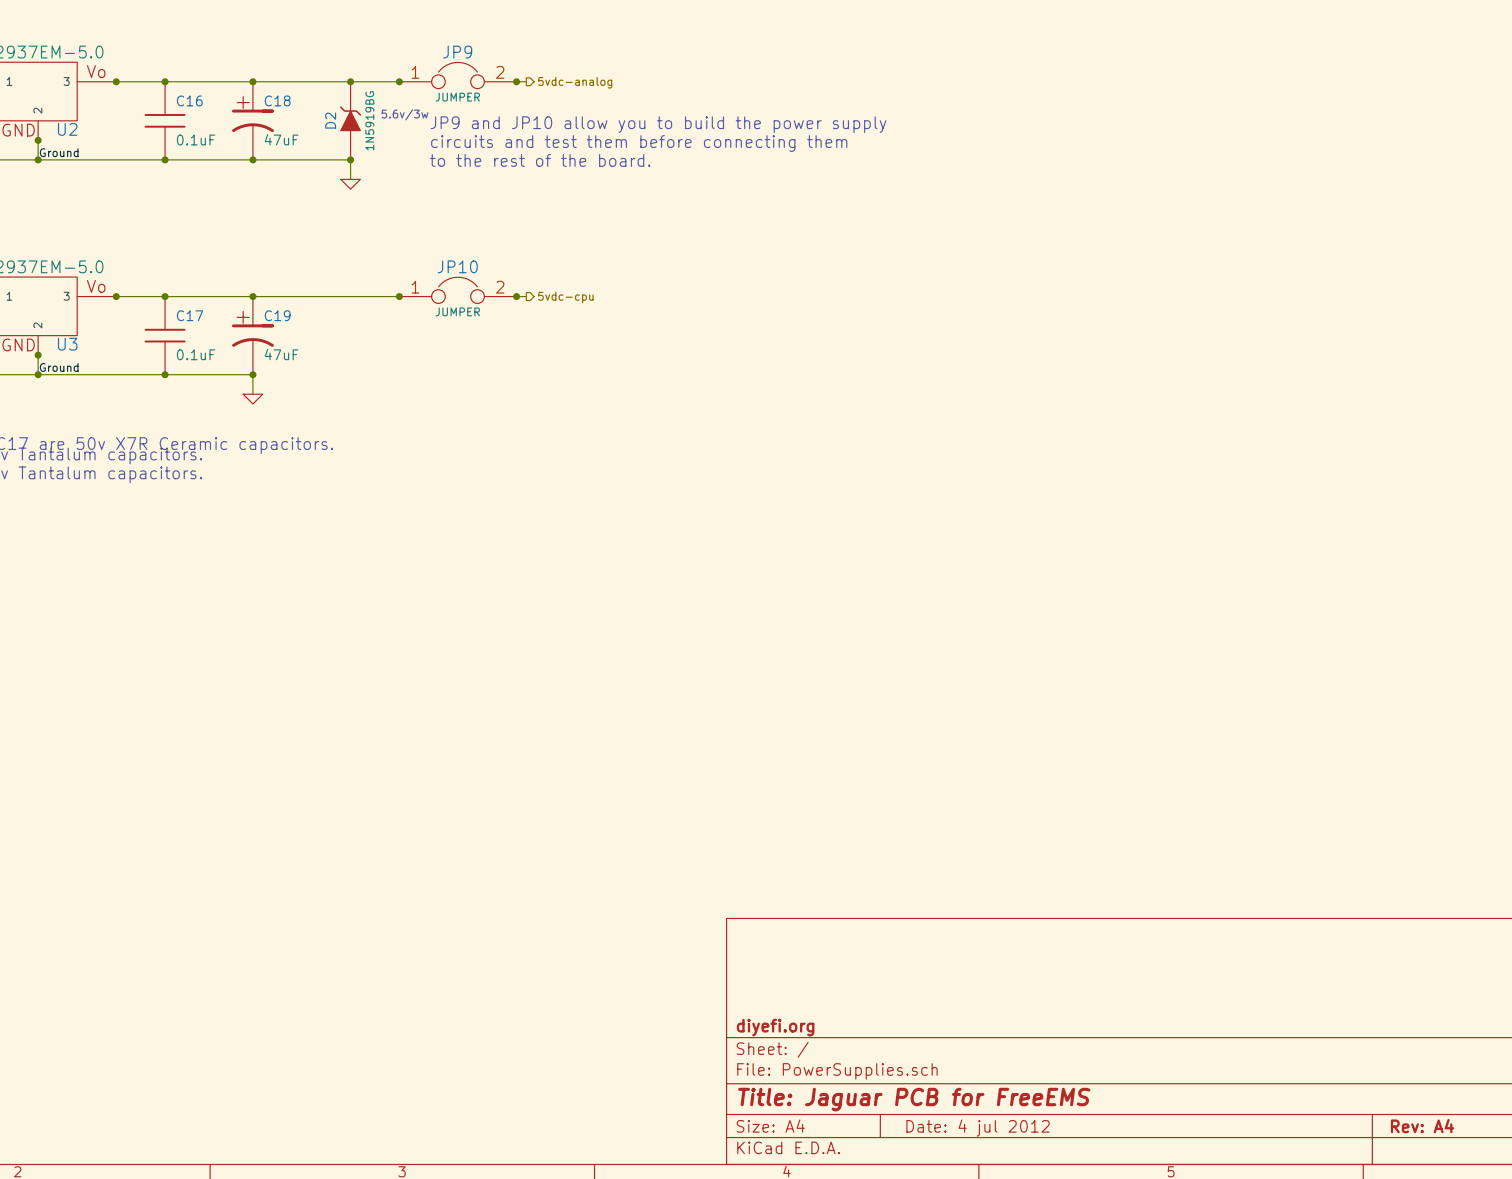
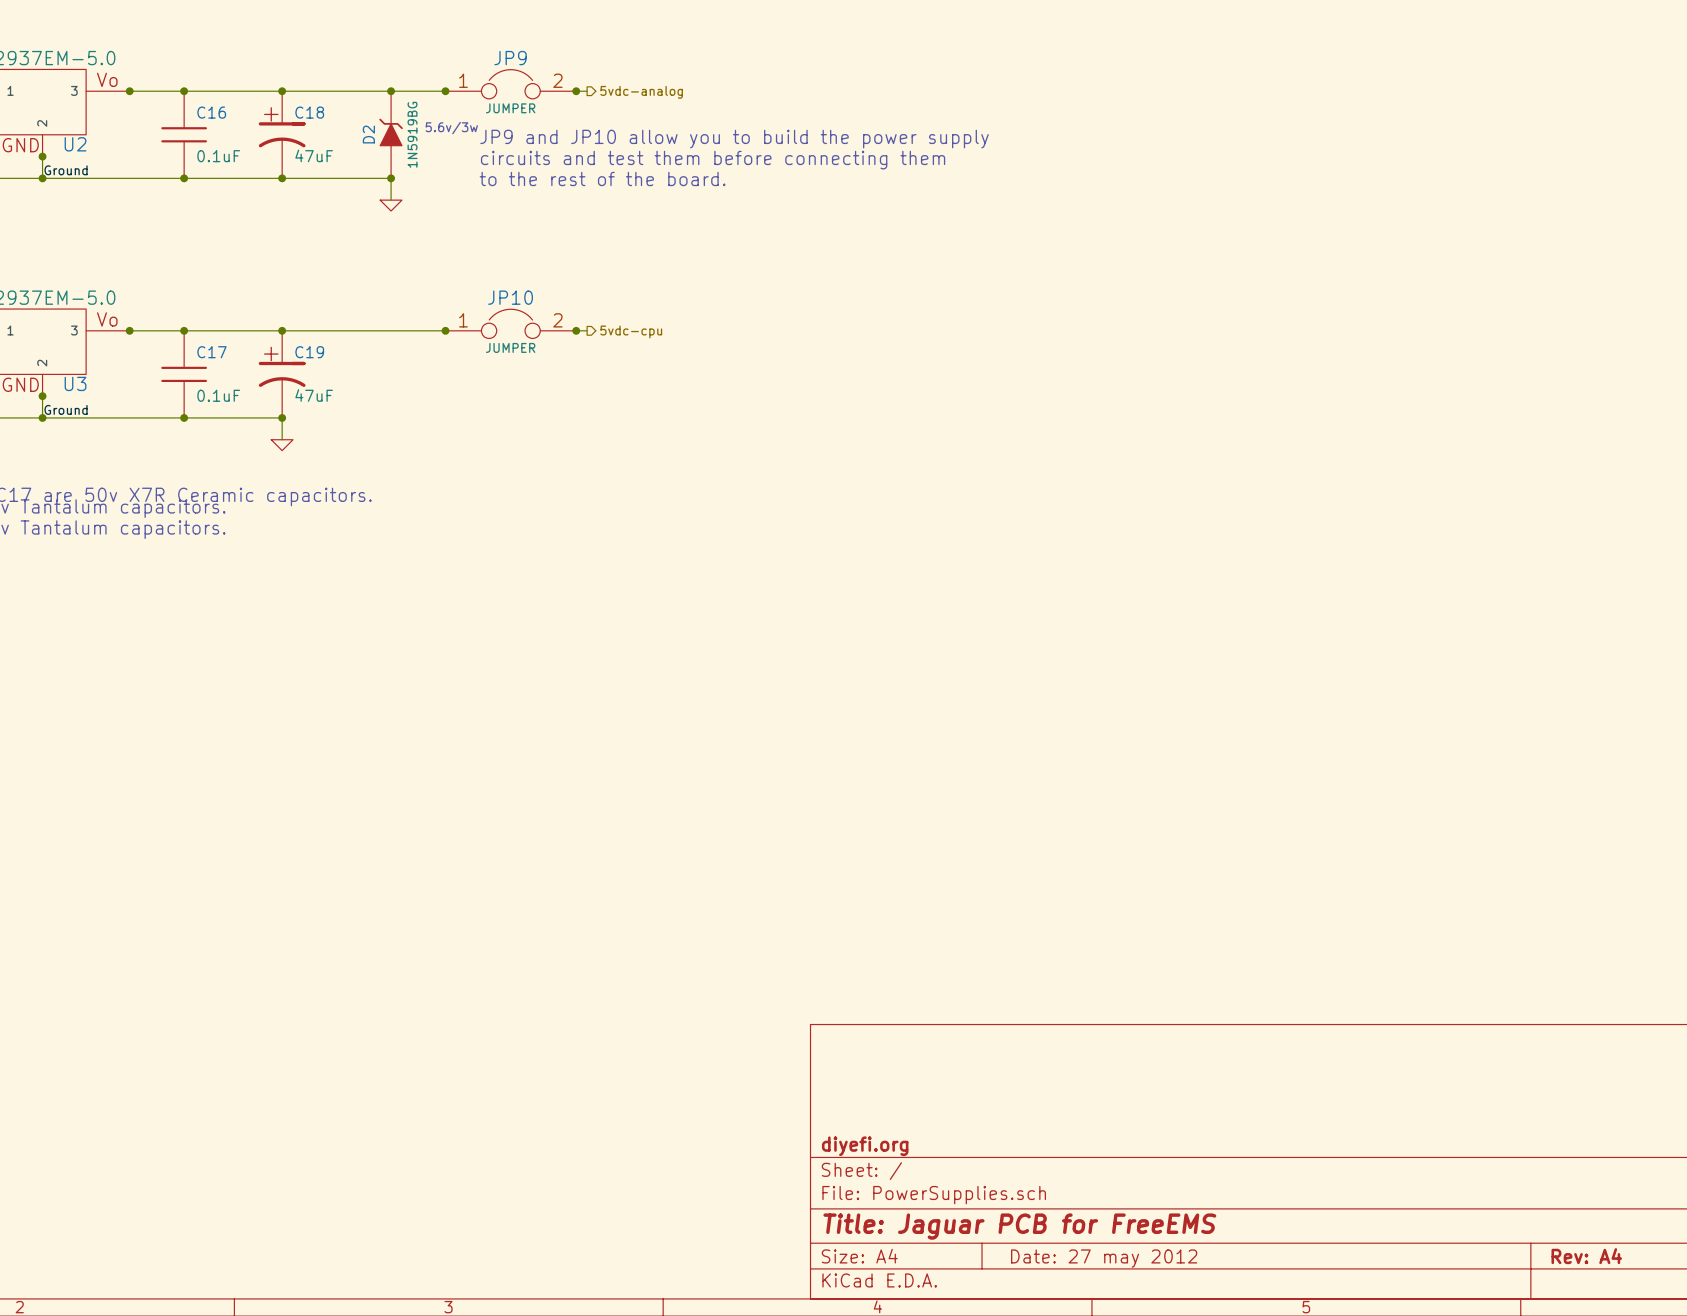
title block: Date: 4 jul 2012 (978, 1128) -> Date: 27 may 2012 (1104, 1258)

